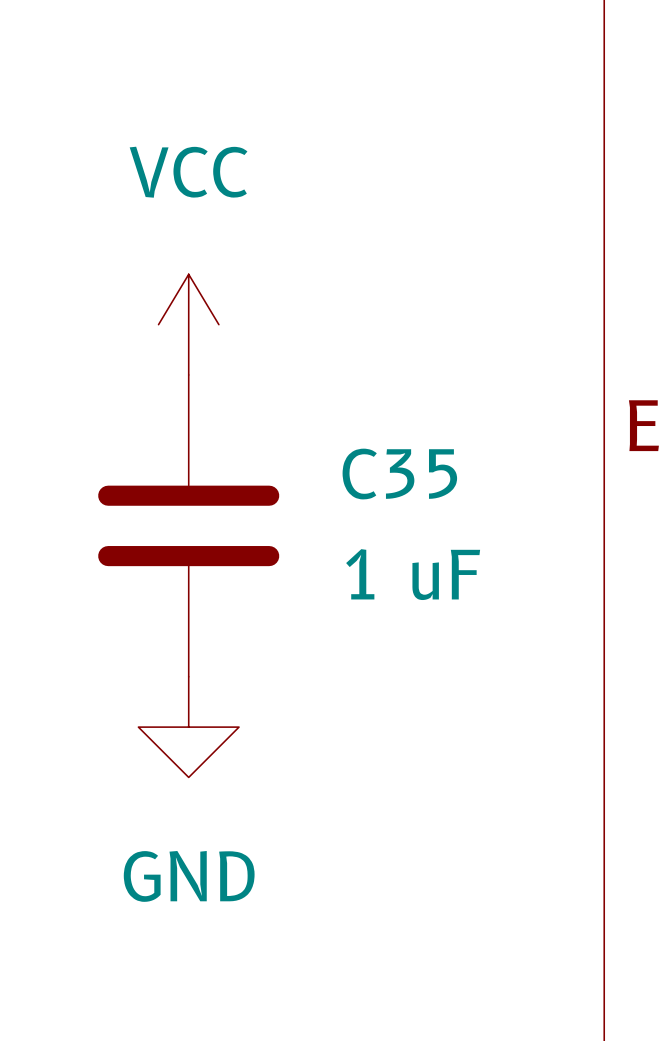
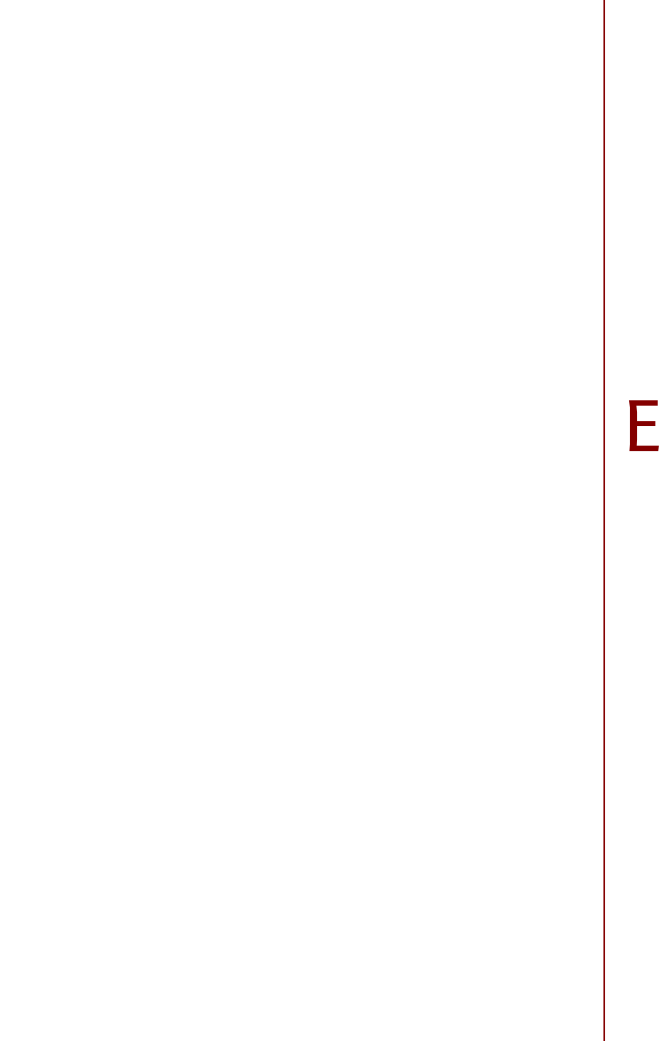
power symbol: VCC (188, 324) -> none
C35: 1 uF (188, 525) -> none
power symbol: GND (188, 727) -> none

